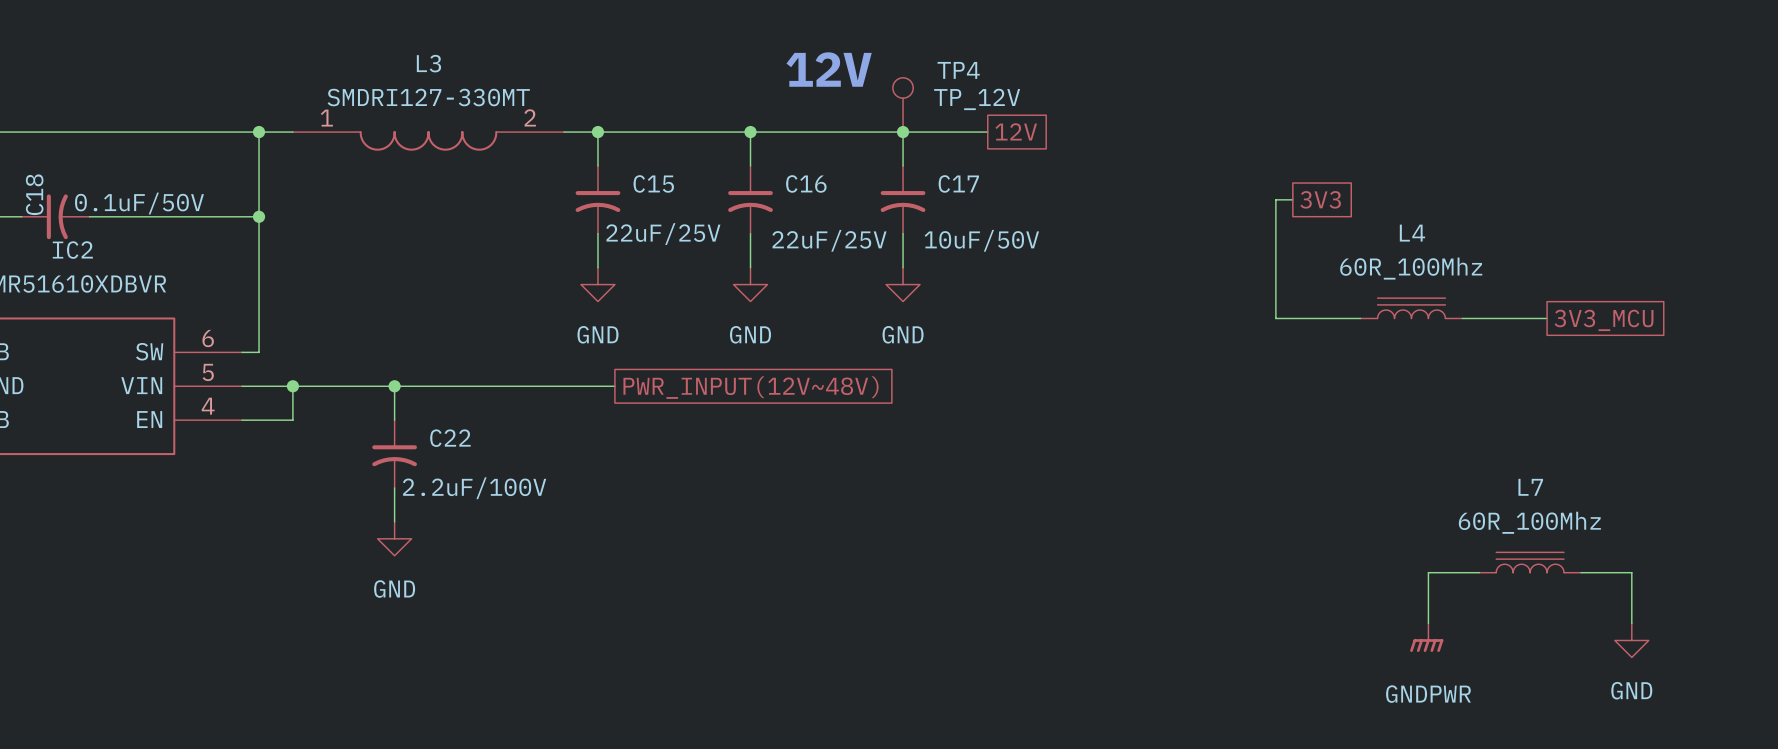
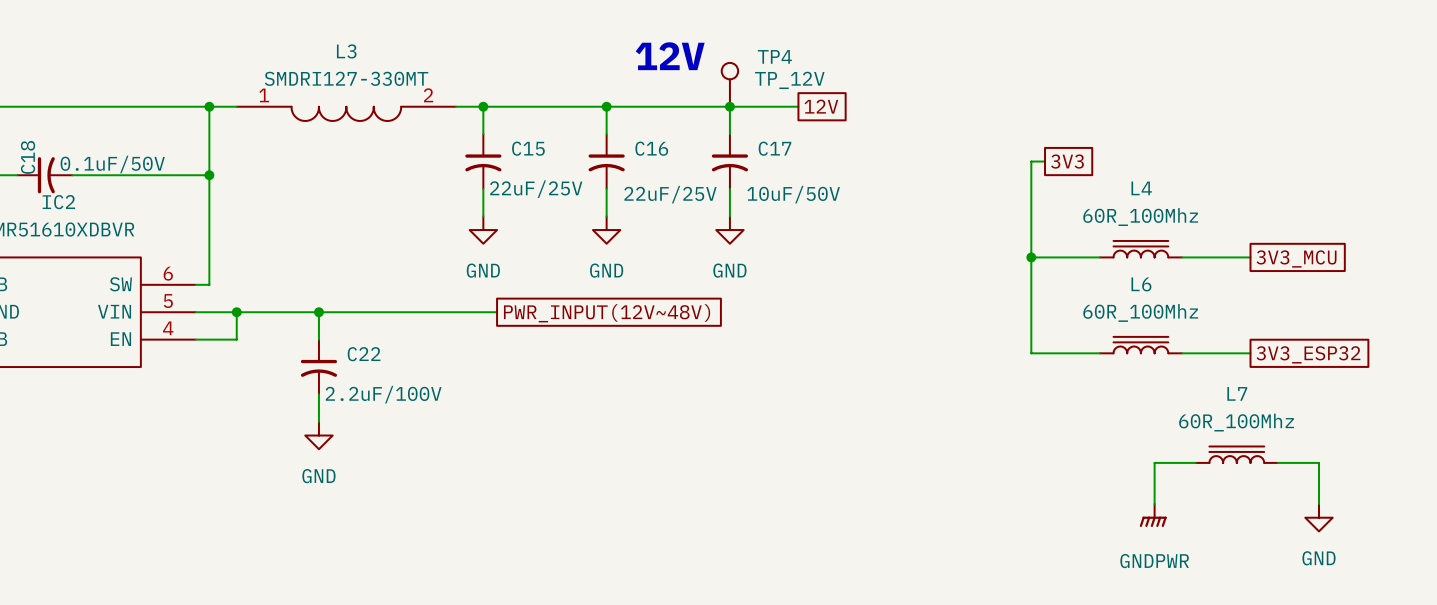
wire: none -> (1031, 257) (1031, 353) (1099, 353)
junction: none -> (1031, 257)
L6: none -> 60R_100Mhz (1140, 345)
wire: none -> (1182, 353) (1250, 353)
global label: none -> 3V3_ESP32 (1308, 354)

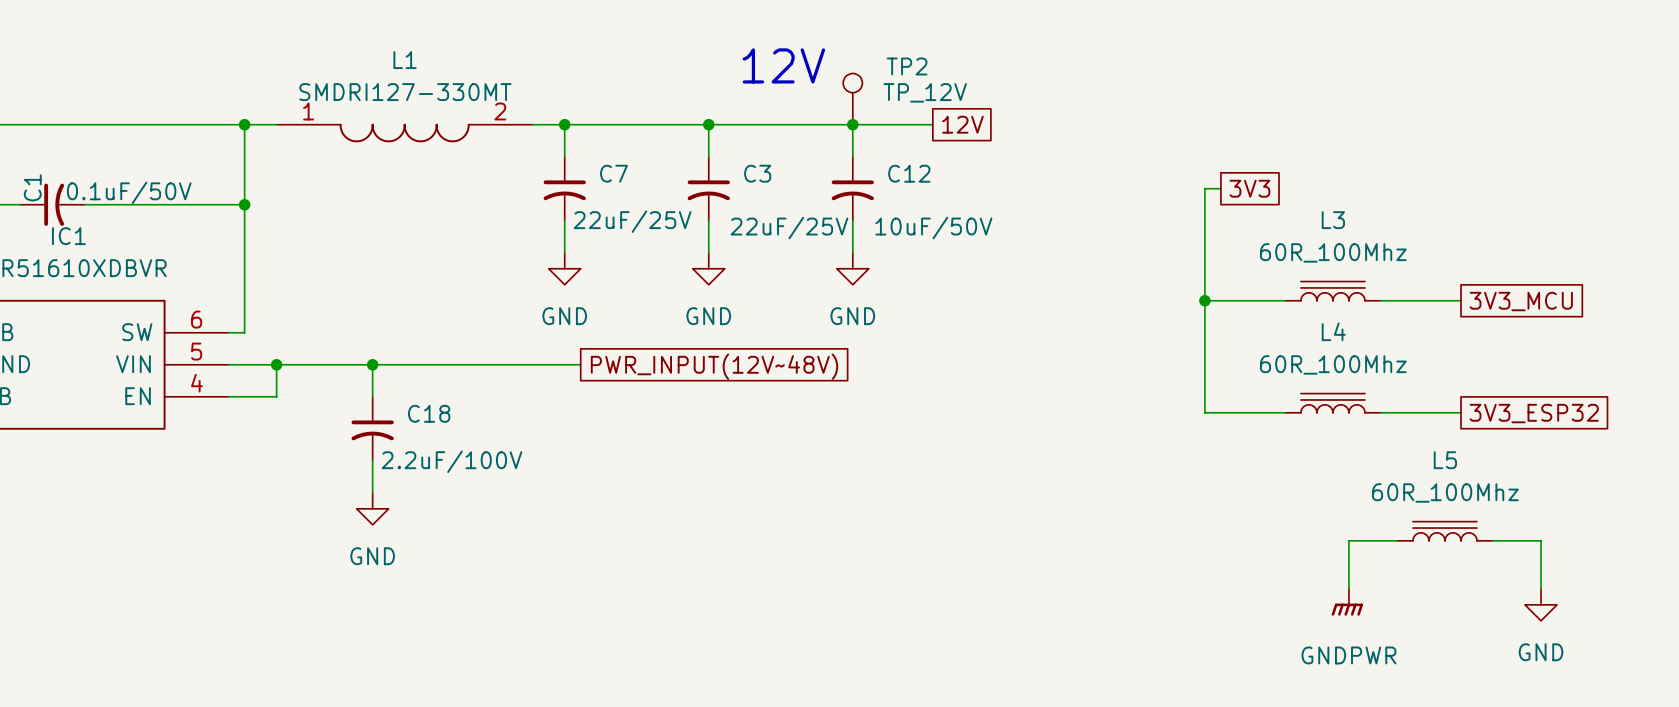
L3 name: L3 (346, 51) -> L1 (405, 60)
TP4 name: TP4 (774, 56) -> TP2 (907, 66)
C15 name: C15 (528, 148) -> C7 (613, 173)
C16 name: C16 (651, 148) -> C3 (757, 173)
C17 name: C17 (775, 148) -> C12 (909, 173)
C18 name: C18 (28, 157) -> C1 (32, 187)
L4 name: L4 (1141, 188) -> L3 (1333, 220)
IC2 name: IC2 (58, 202) -> IC1 (68, 236)
L6 name: L6 (1141, 284) -> L4 (1333, 331)
C22 name: C22 (364, 354) -> C18 (429, 413)
L7 name: L7 (1237, 393) -> L5 (1445, 460)

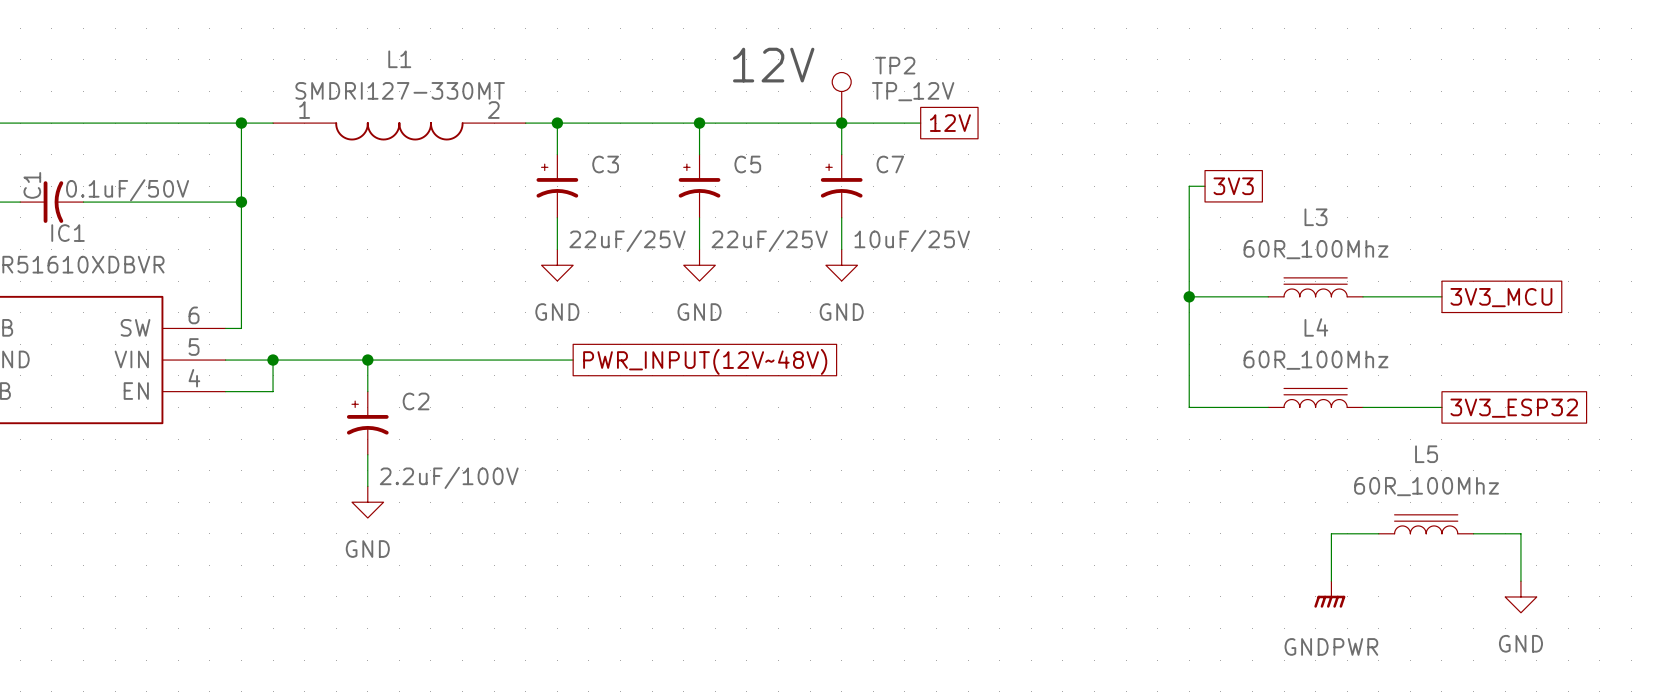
C7 symbol: [543, 156, 586, 221] -> [820, 154, 863, 218]
C3 symbol: [687, 156, 730, 221] -> [536, 154, 579, 218]
C5: none -> 22uF/25V (699, 186)
C12: 10uF/50V (852, 188) -> none
C7 value: 22uF/25V (632, 221) -> 10uF/25V (912, 240)
C18: 2.2uF/100V (372, 428) -> none
C2: none -> 2.2uF/100V (367, 423)

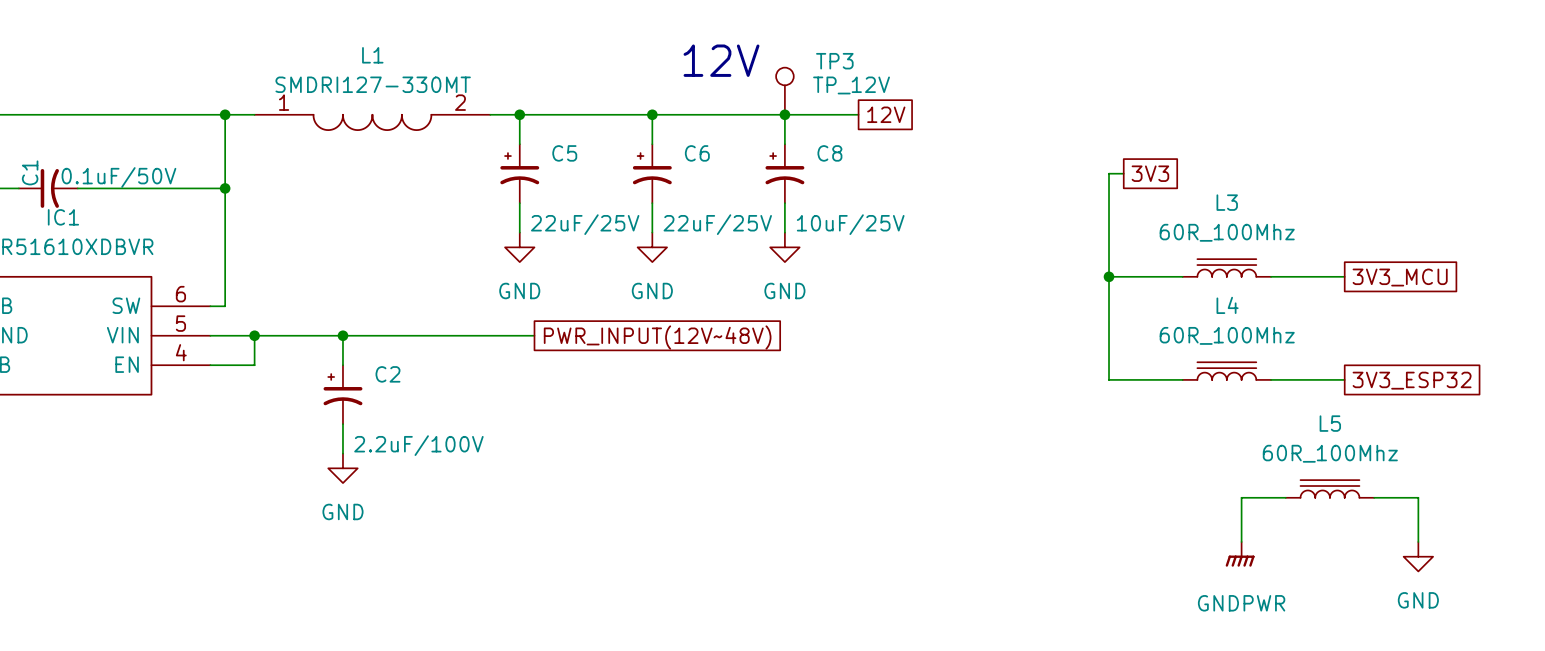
TP2 name: TP2 (895, 65) -> TP3 (834, 61)
C3 name: C3 (605, 164) -> C5 (564, 153)
C5 name: C5 (747, 164) -> C6 (697, 153)
C7 name: C7 (890, 164) -> C8 (829, 153)

